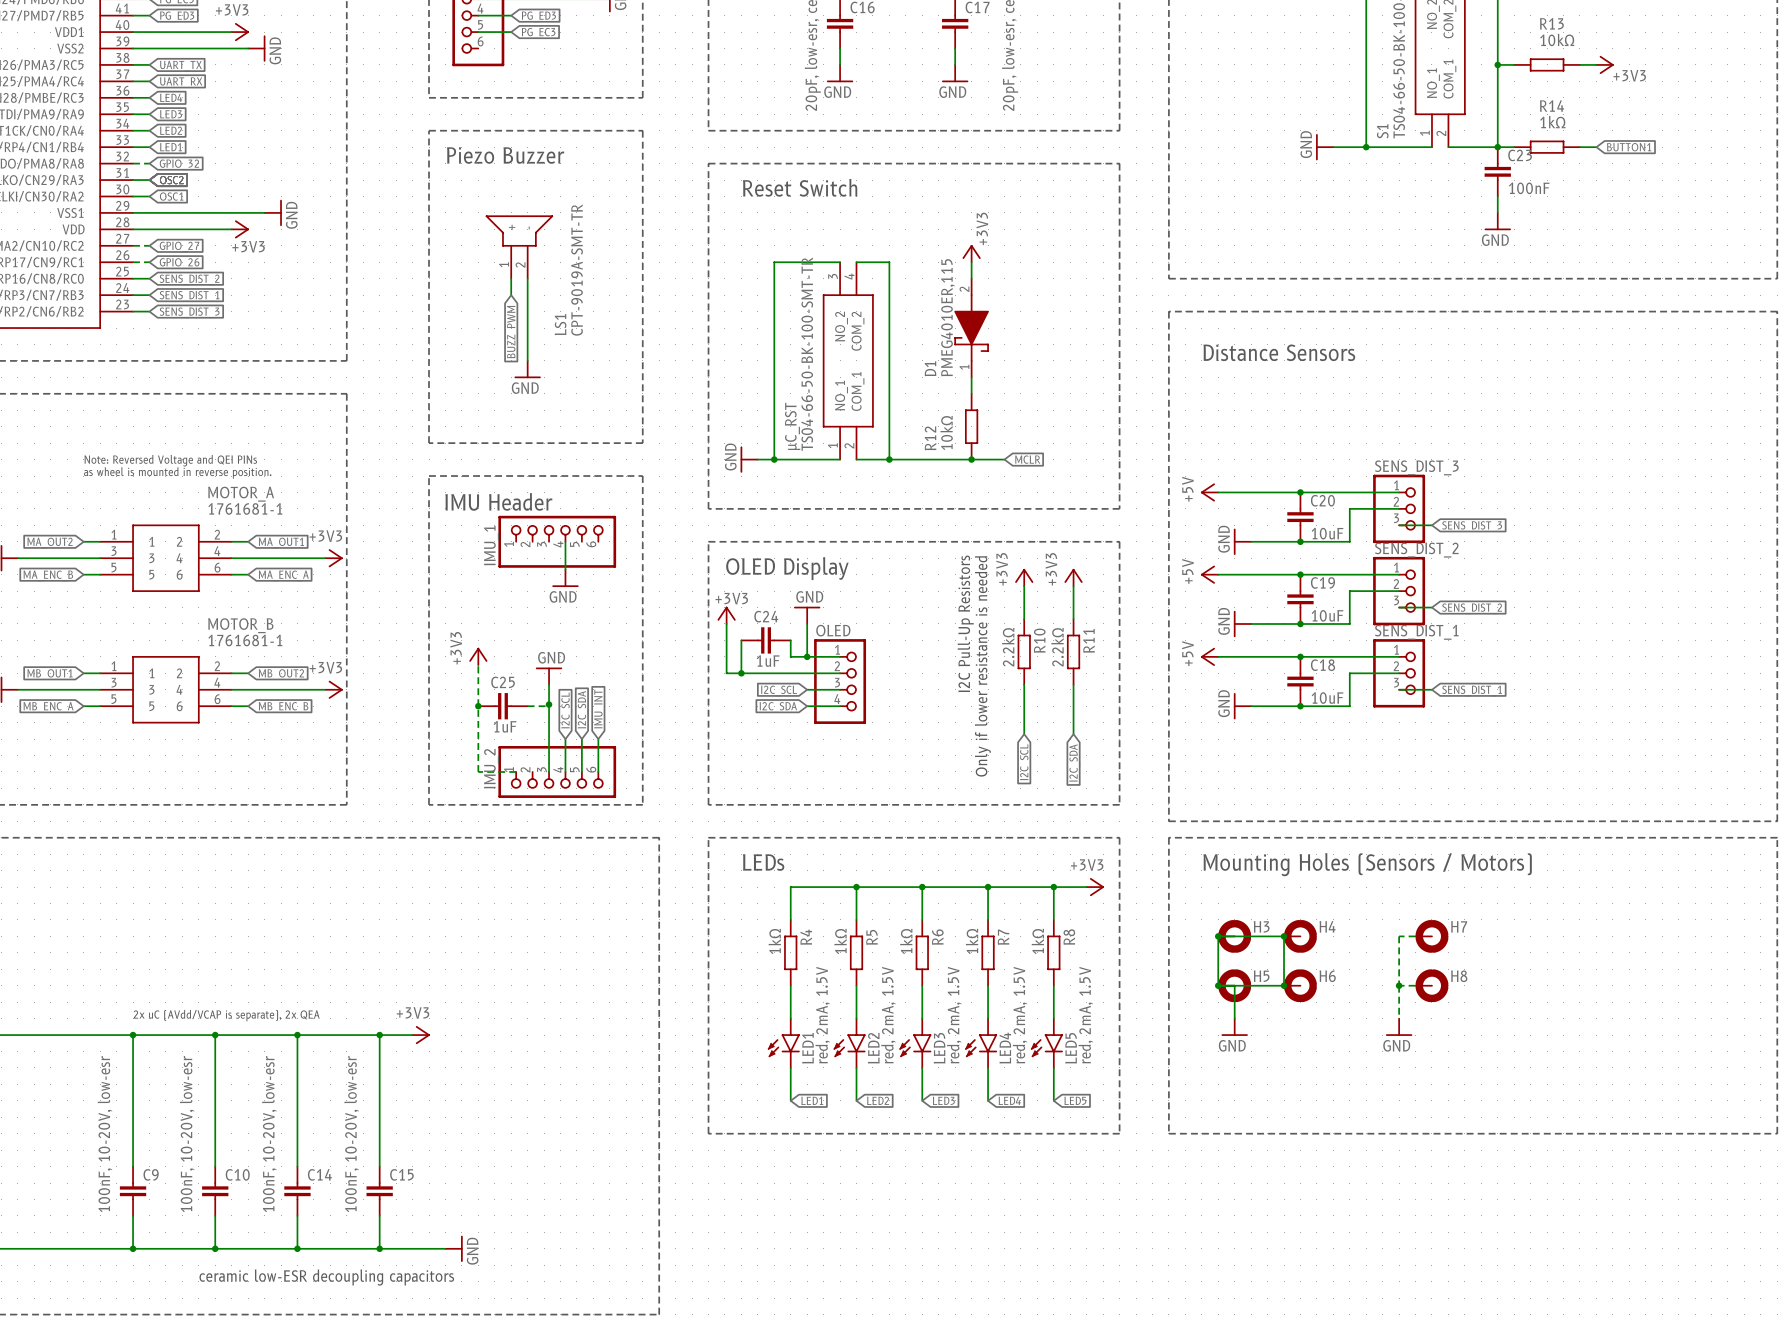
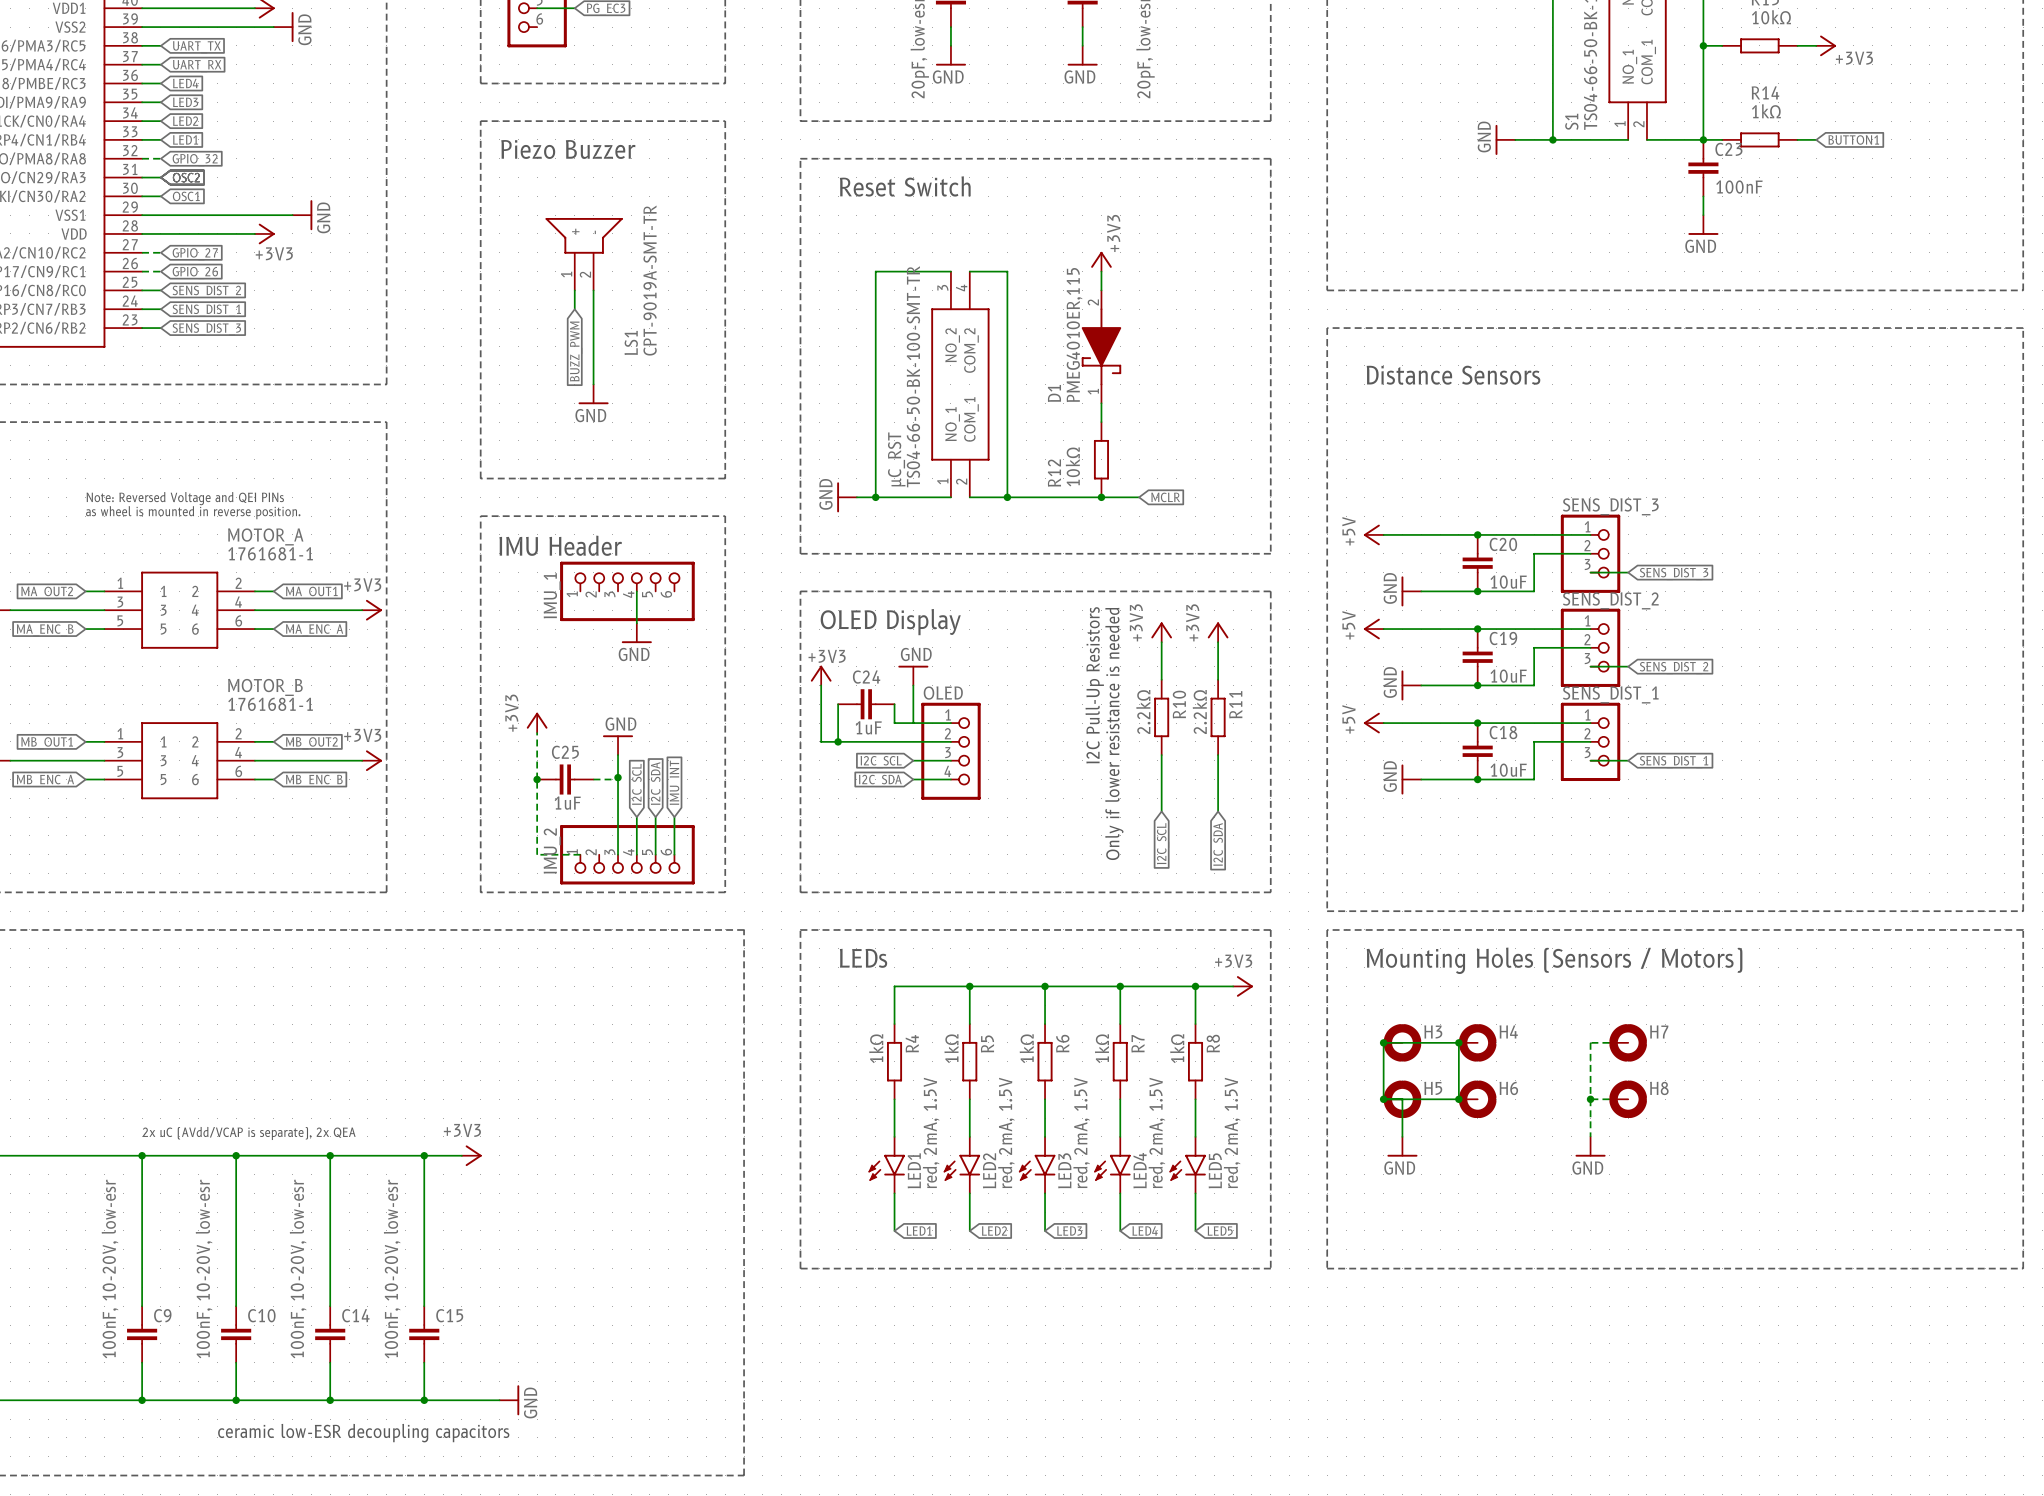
junction: (807, 656) -> none

